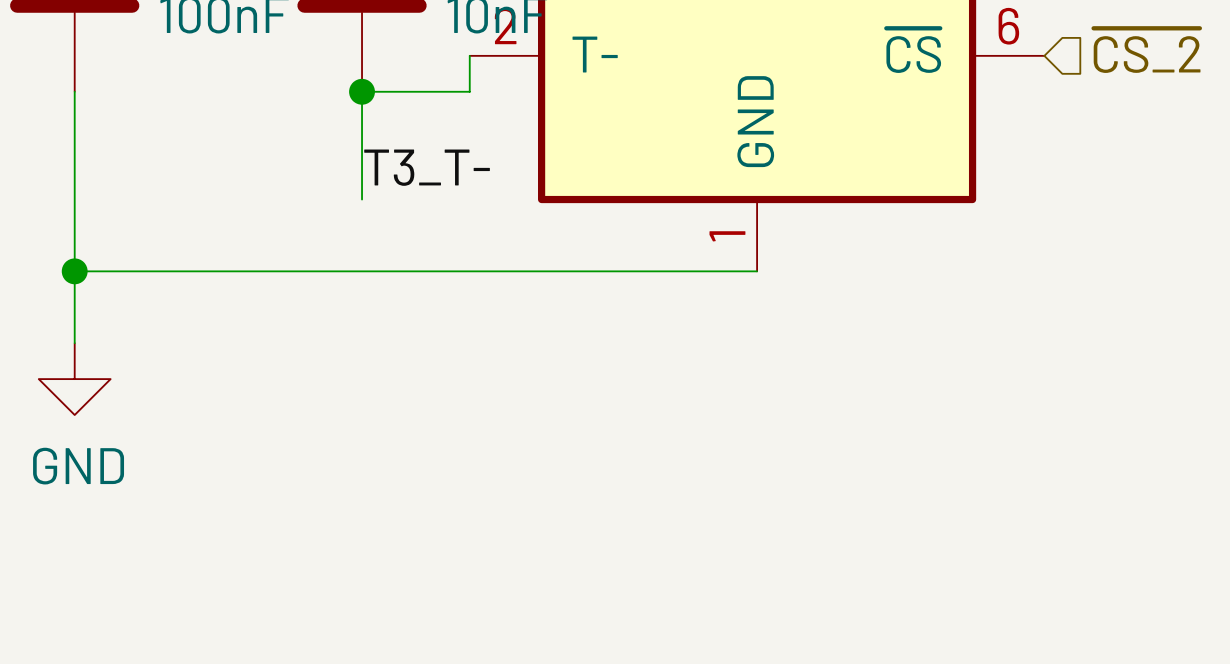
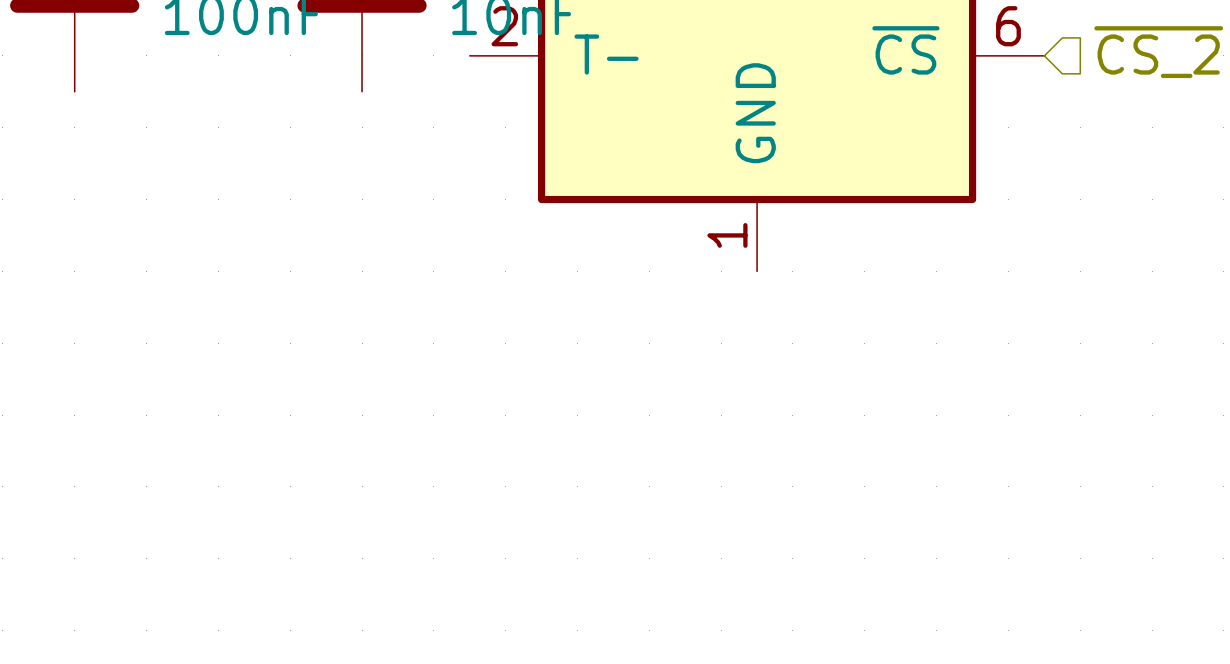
wire: (469, 55) (469, 91) (362, 91) (362, 199) -> none
wire: (74, 91) (74, 343) -> none
junction: (362, 91) -> none
label: T3_T- (427, 167) -> none
wire: (74, 271) (757, 271) -> none
junction: (74, 271) -> none
power symbol: GND (74, 379) -> none

